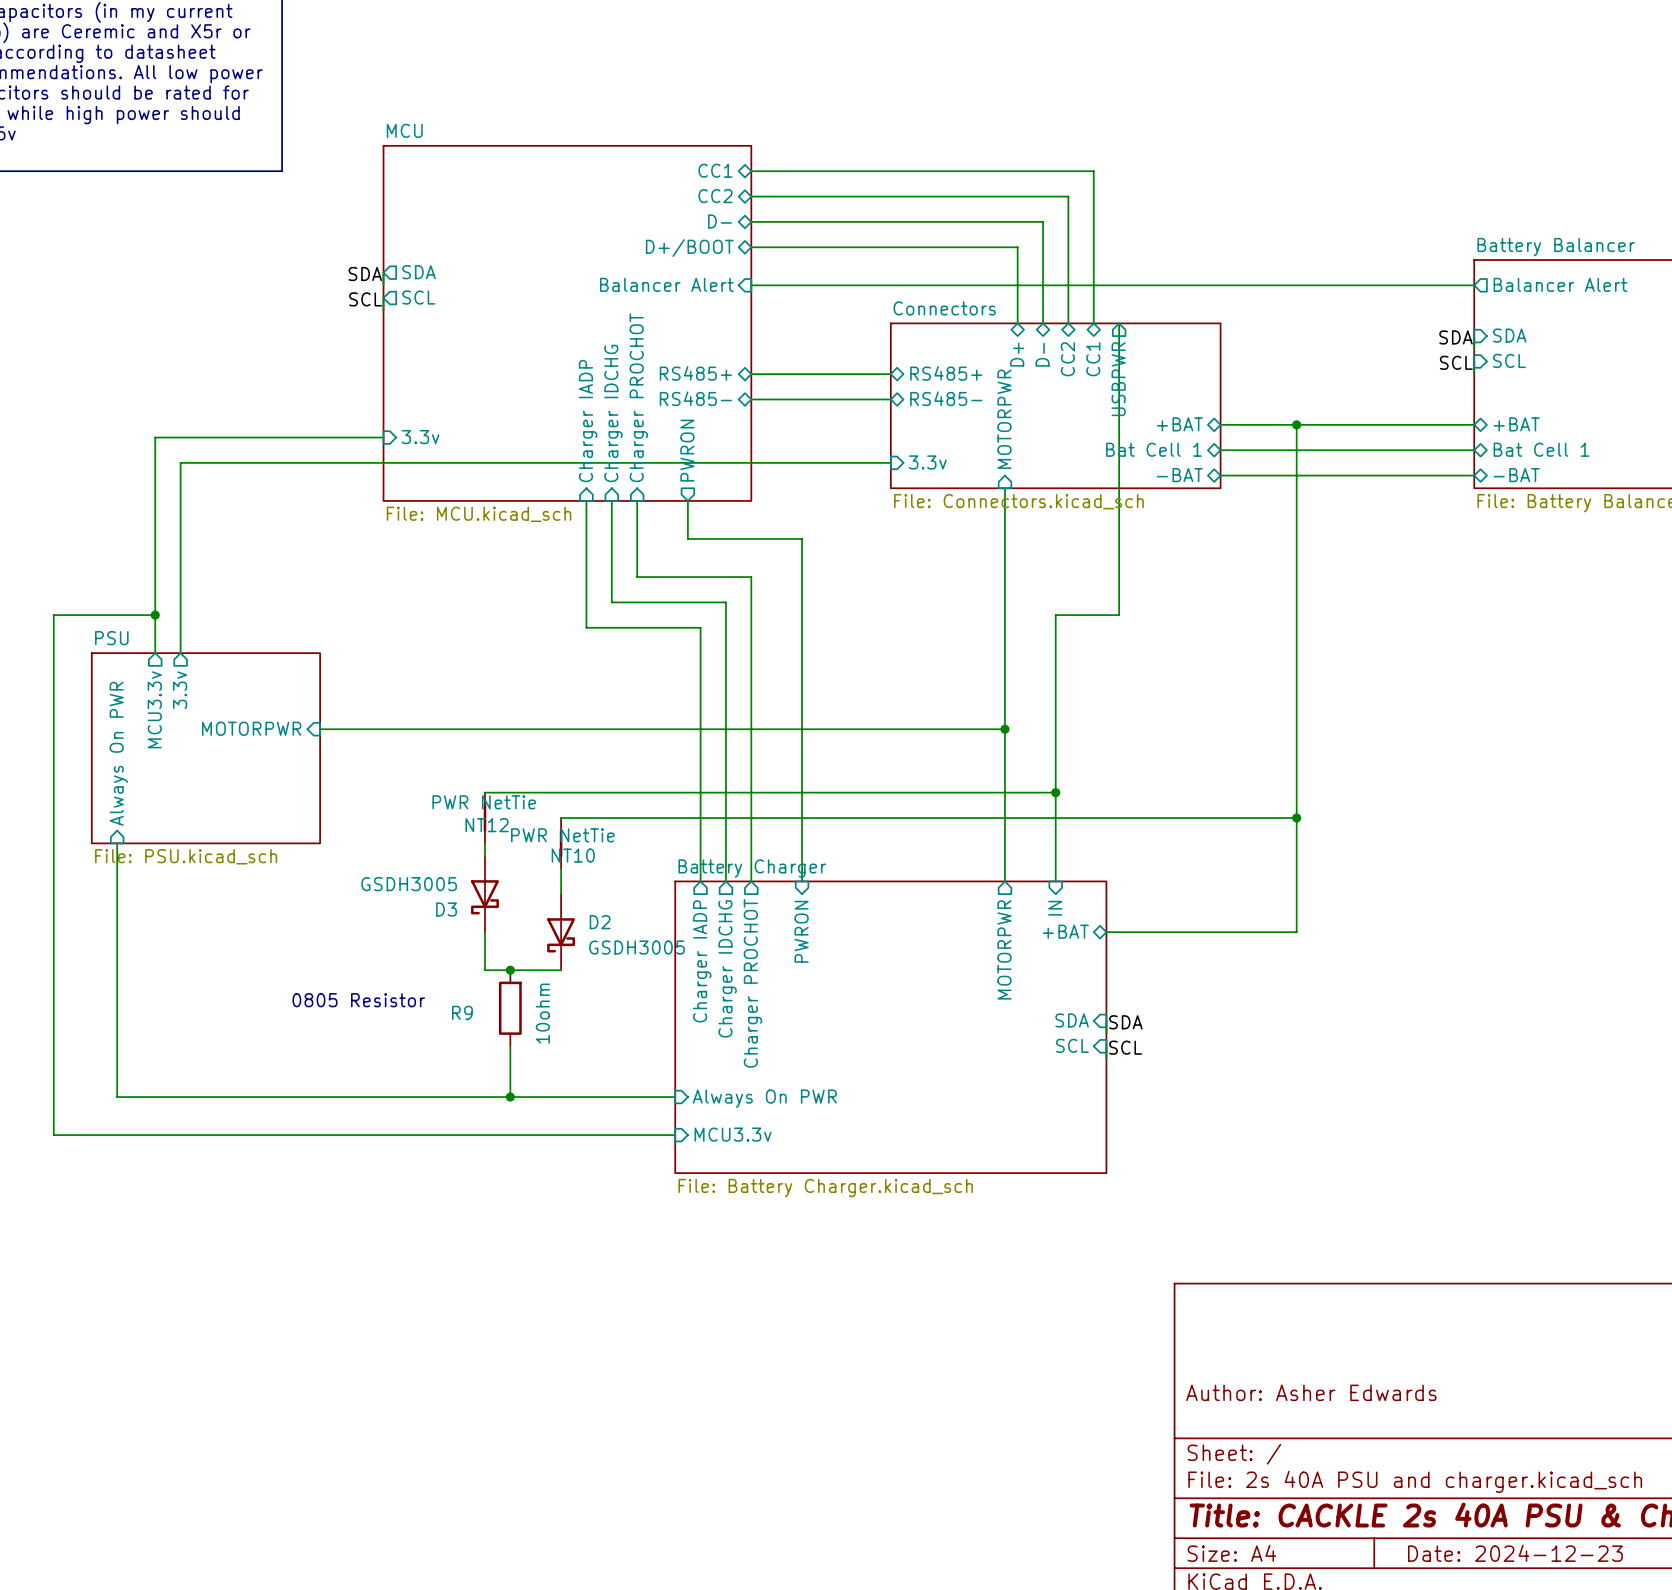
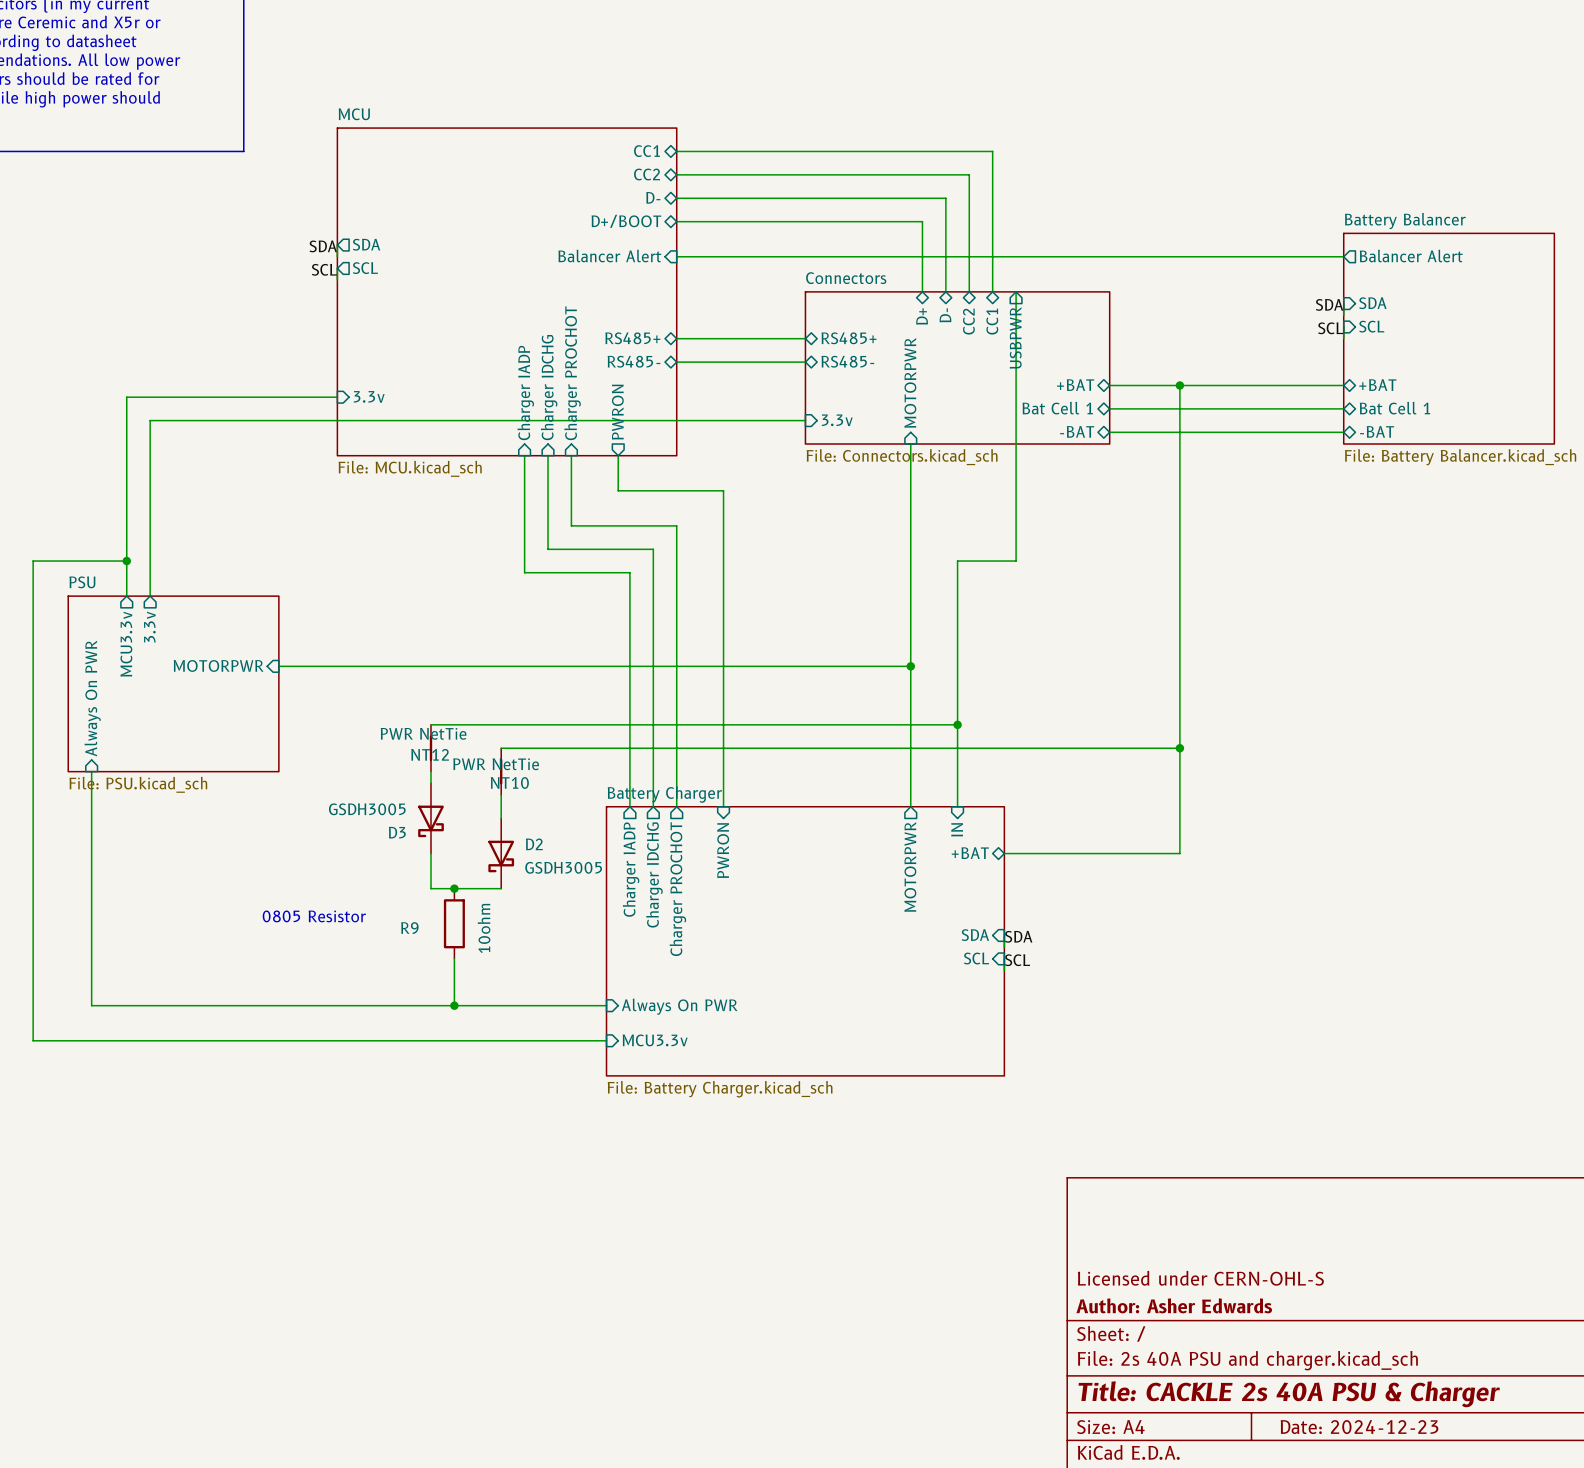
title block: Author: Asher Edwards (1311, 1392) -> Licensed under CERN-OHL-S (1200, 1278)
title block: none -> Author: Asher Edwards (1174, 1305)

